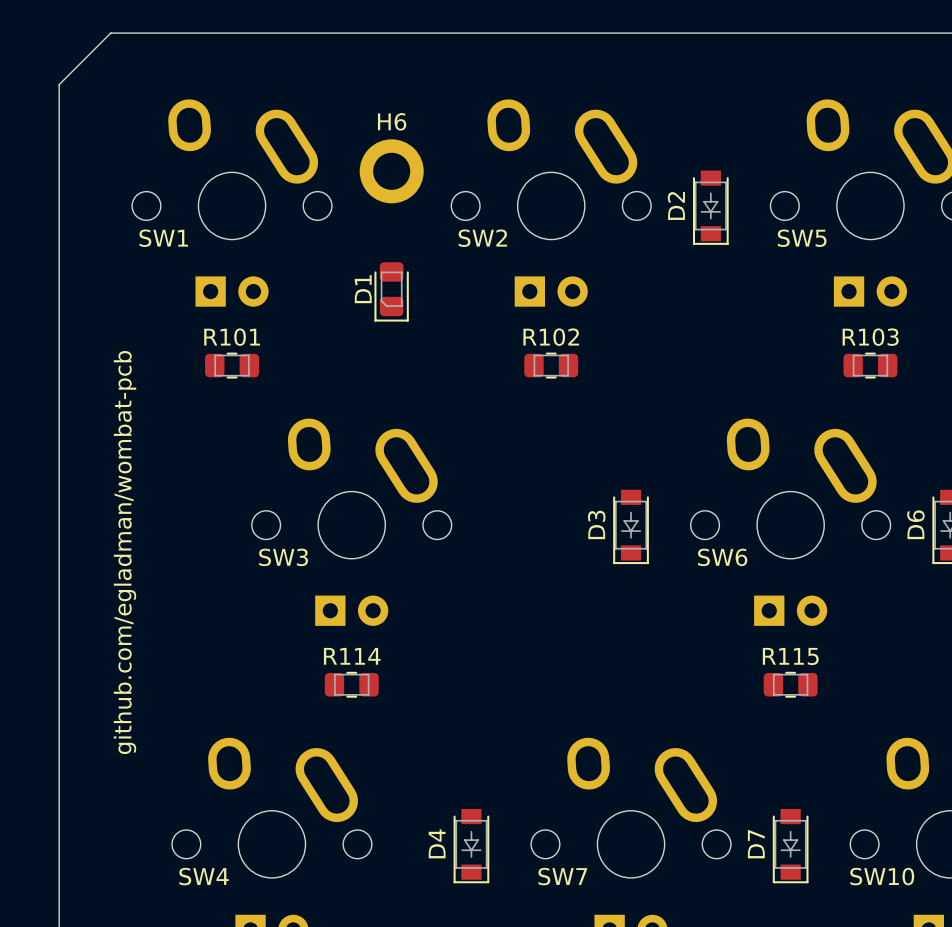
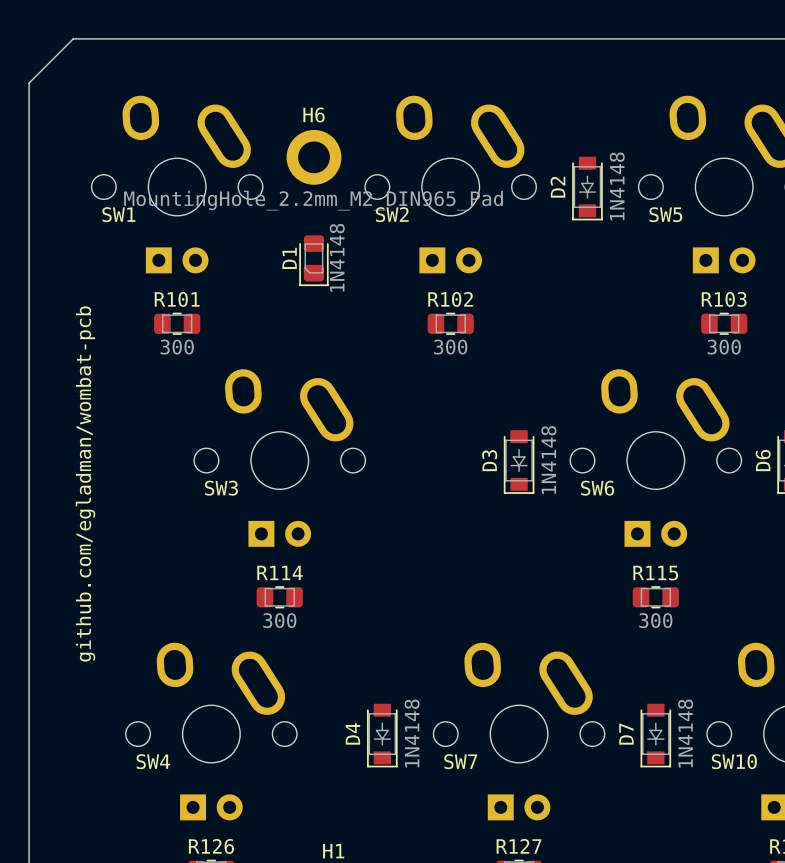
D2 value: none -> 1N4148 (617, 186)
H6 value: none -> MountingHole_2.2mm_M2_DIN965_Pad (313, 200)
D1 value: none -> 1N4148 (337, 257)
R101 value: none -> 300 (177, 347)
R102 value: none -> 300 (450, 347)
R103 value: none -> 300 (724, 347)
D3 value: none -> 1N4148 (548, 459)
R114 value: none -> 300 (279, 620)
R115 value: none -> 300 (655, 620)
D4 value: none -> 1N4148 (412, 733)
D7 value: none -> 1N4148 (685, 733)

